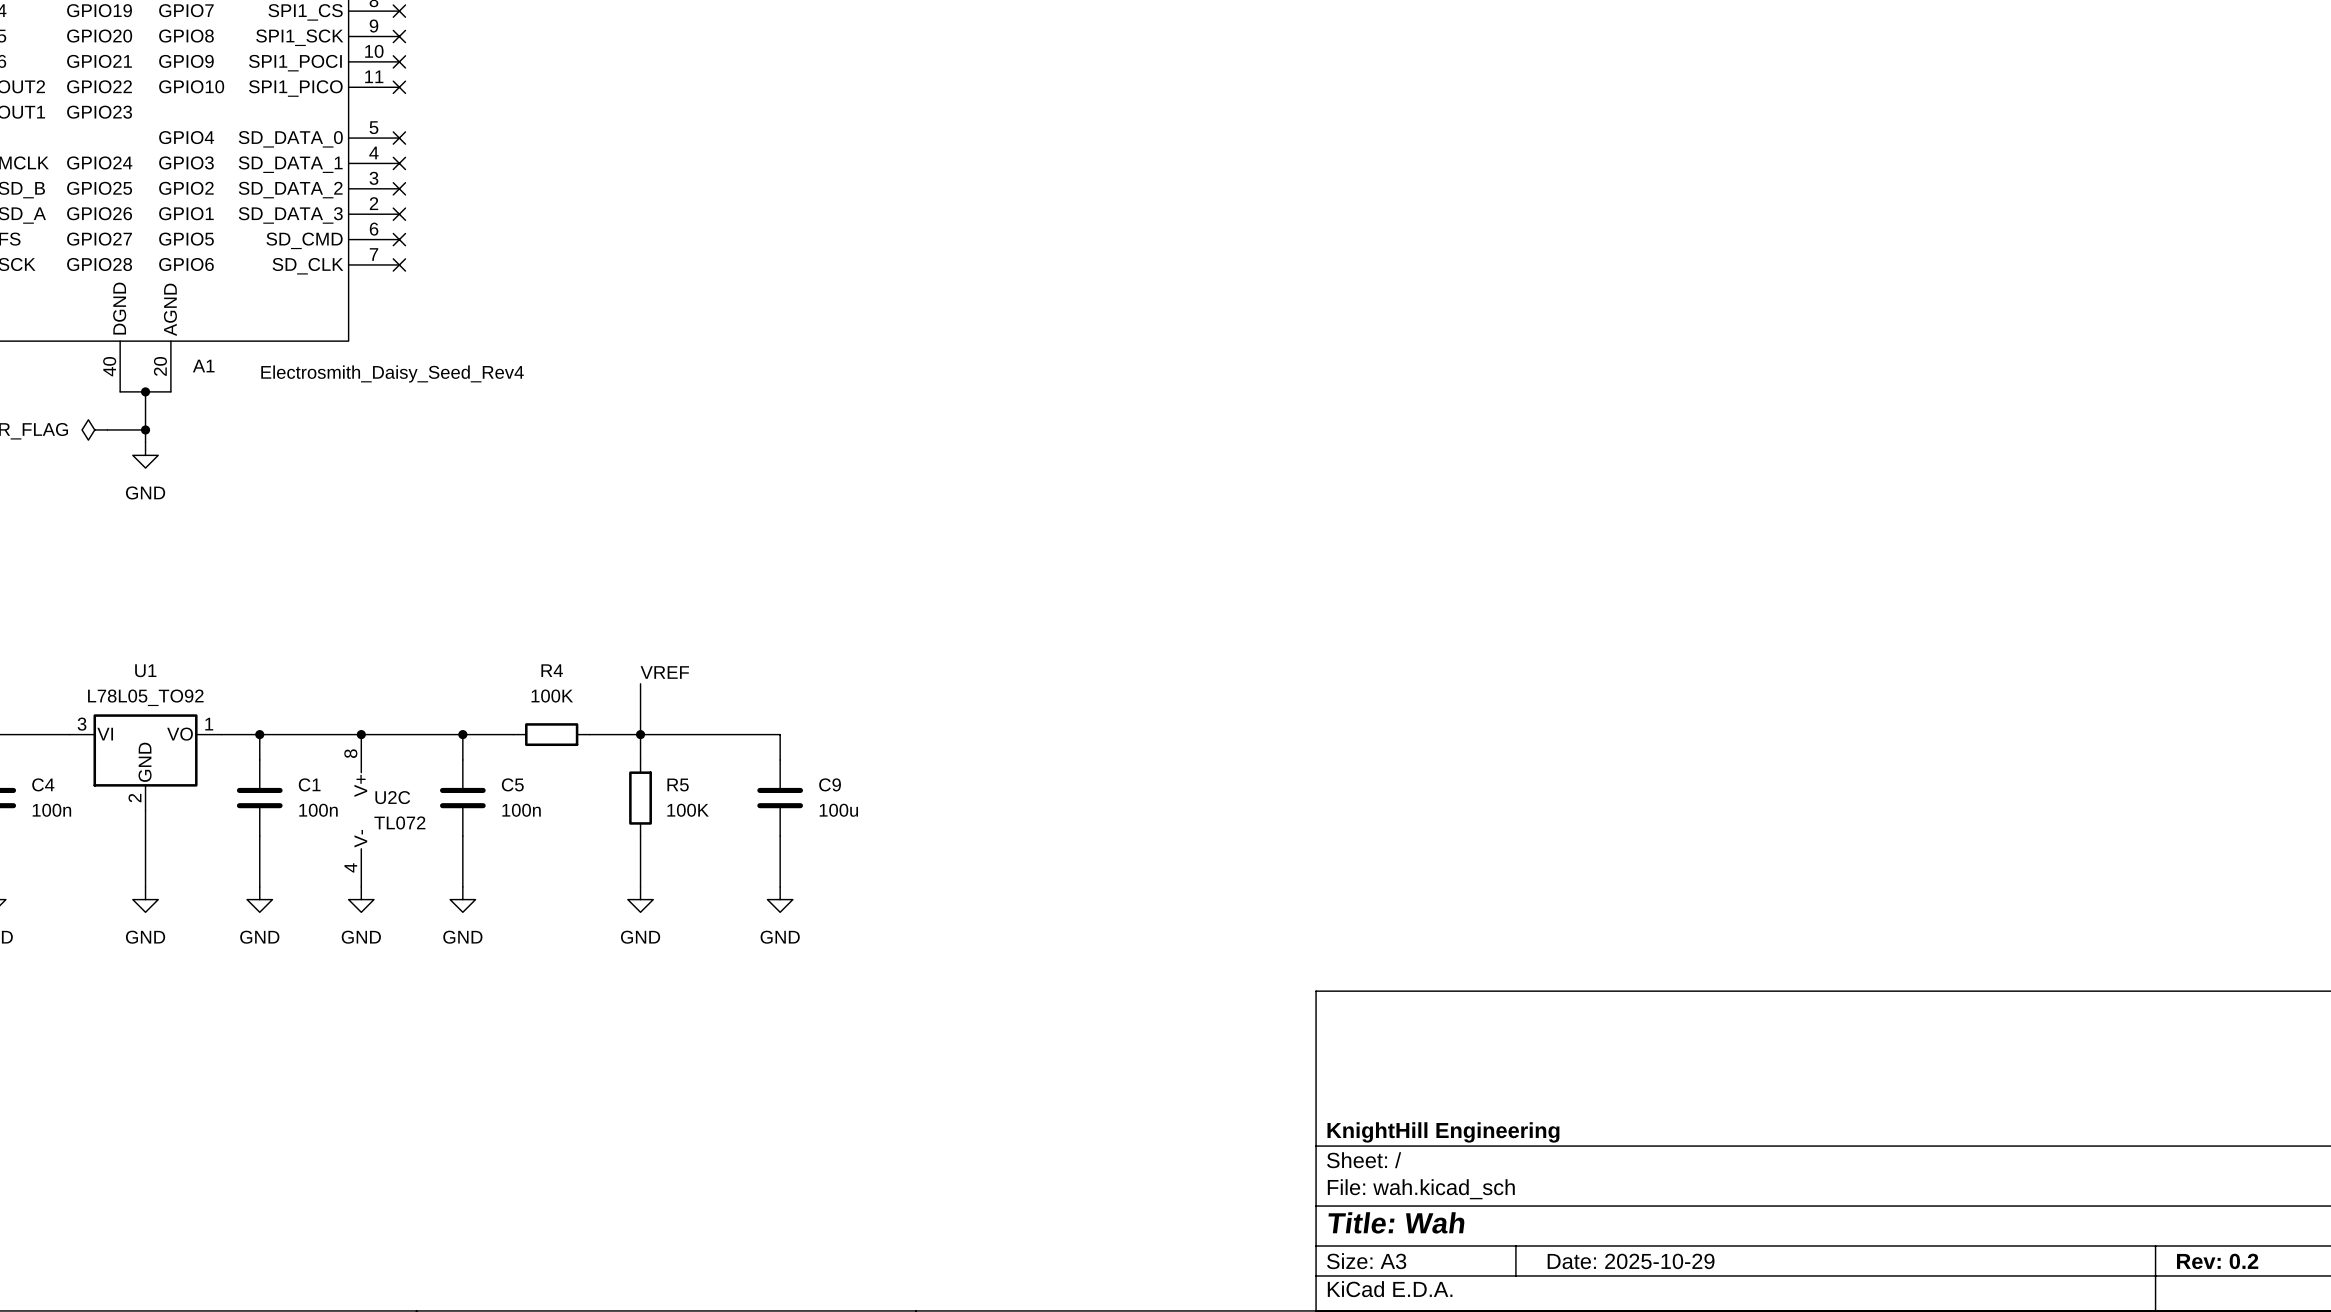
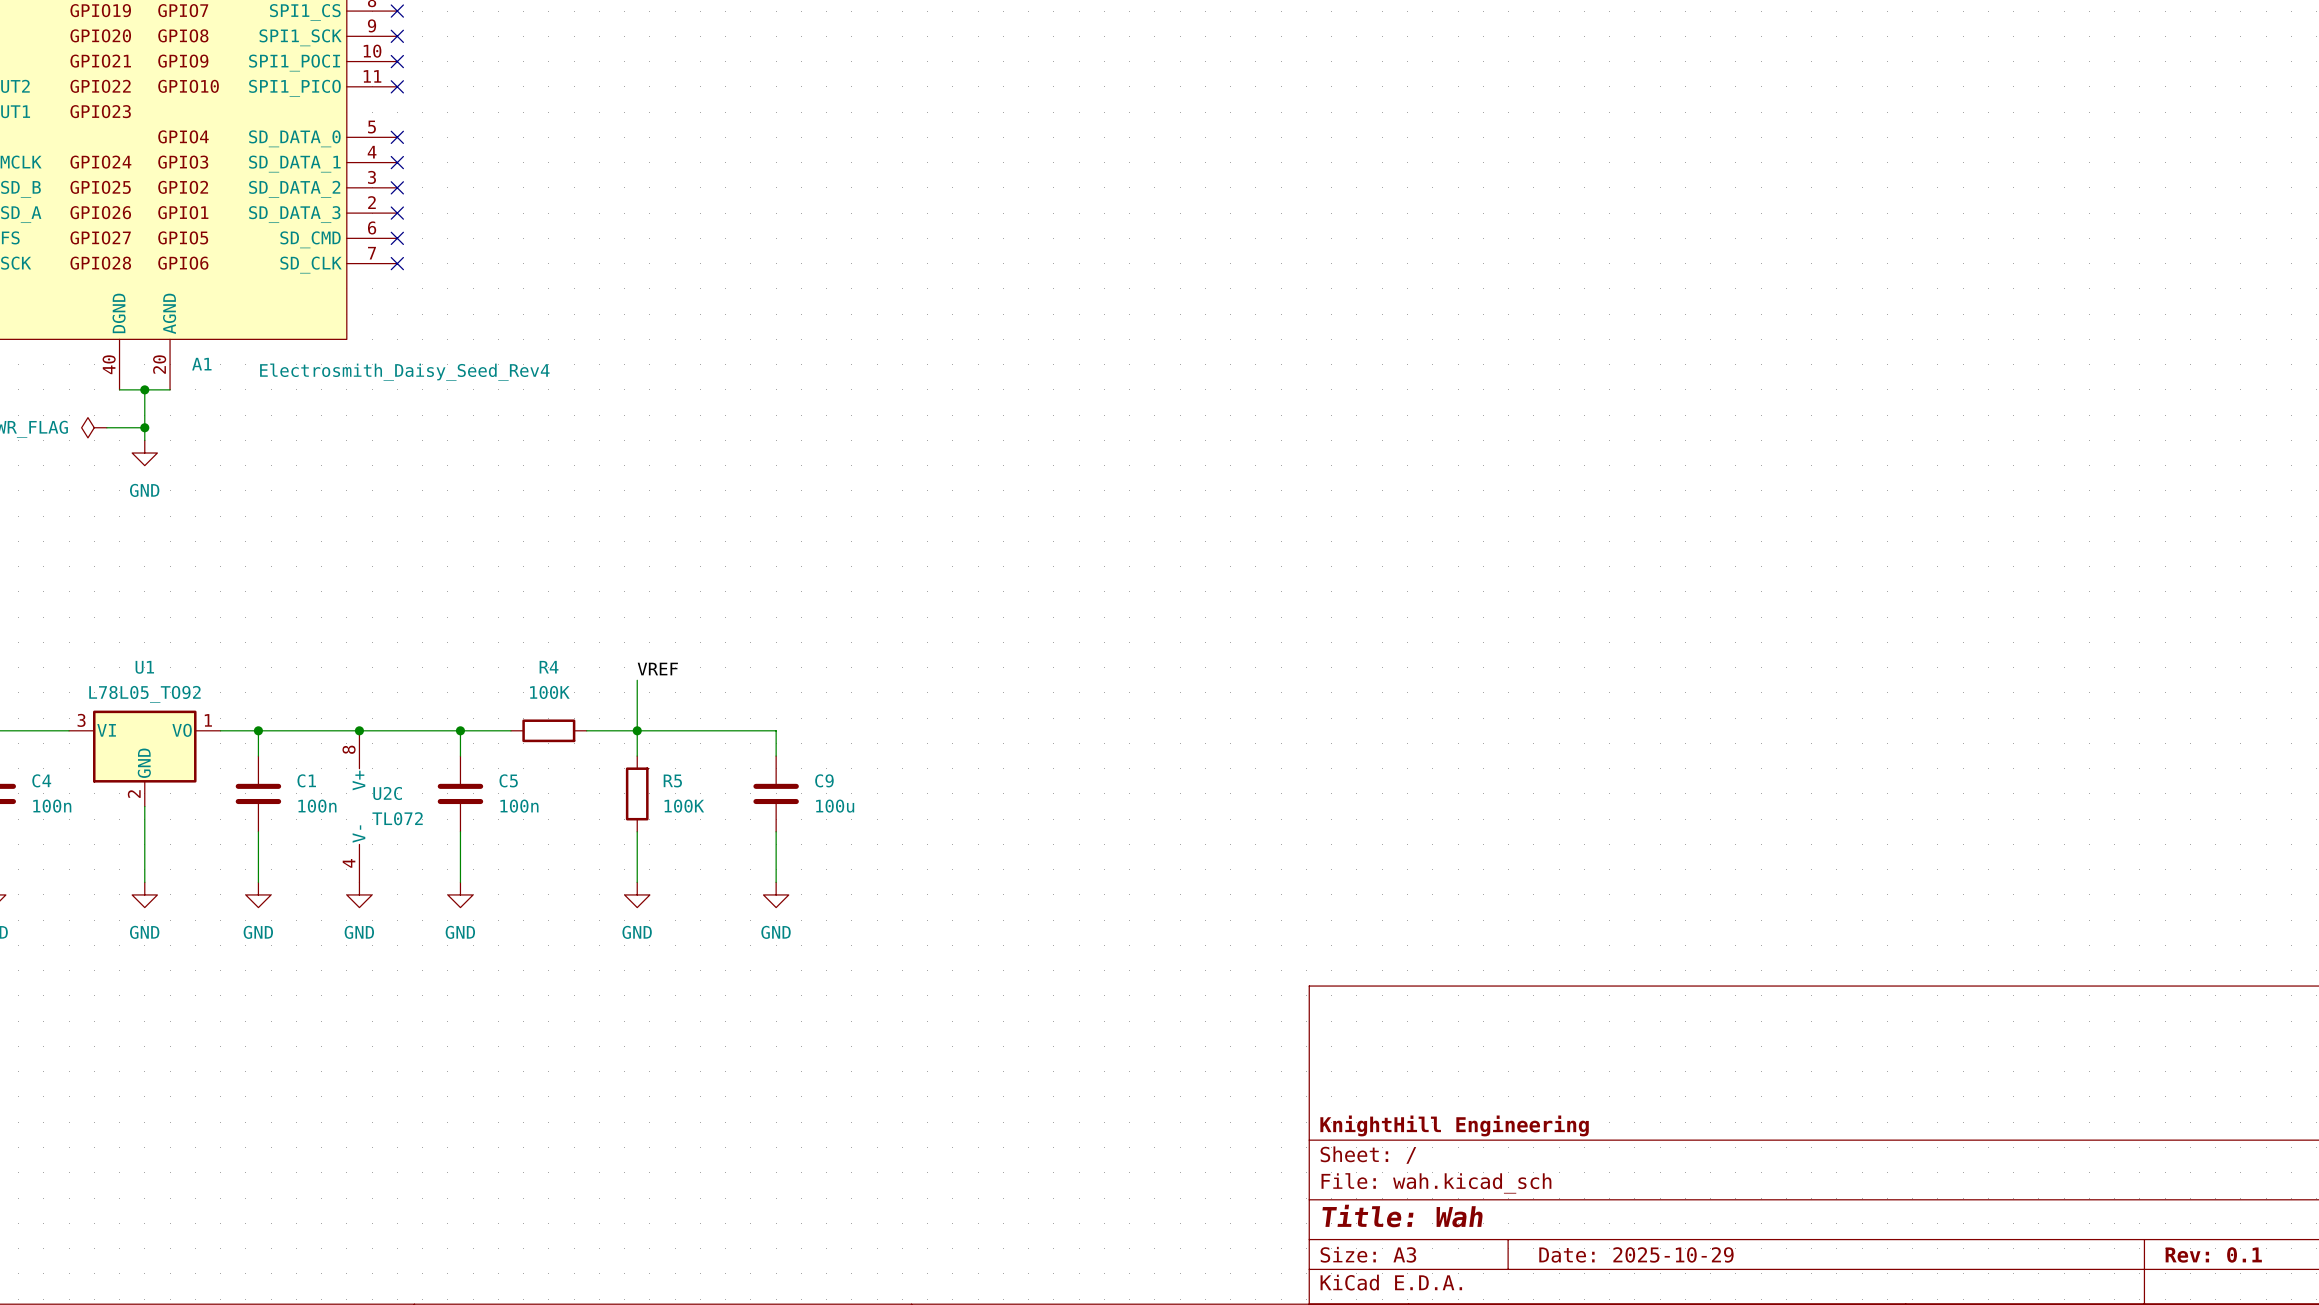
title block: Rev: 0.2 (2217, 1261) -> Rev: 0.1 (2213, 1254)

